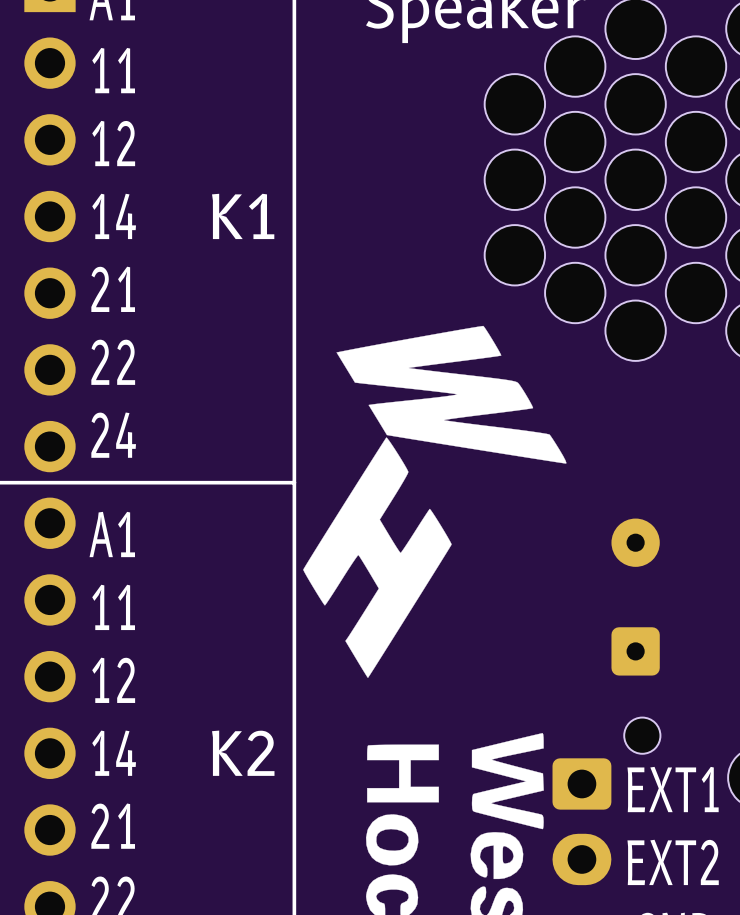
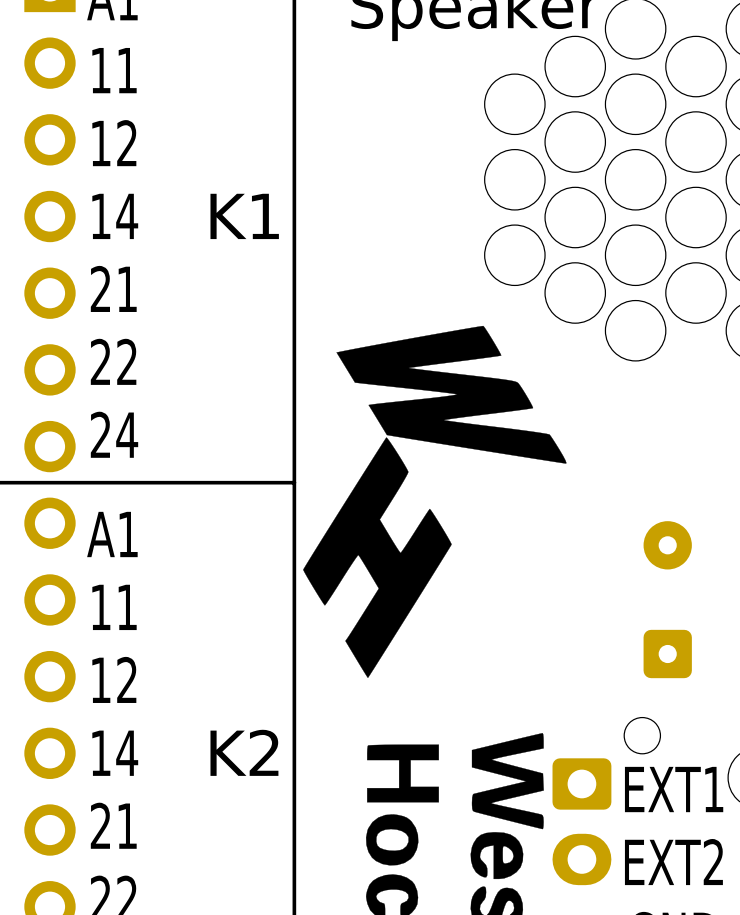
part position: (635, 597) -> (667, 599)

